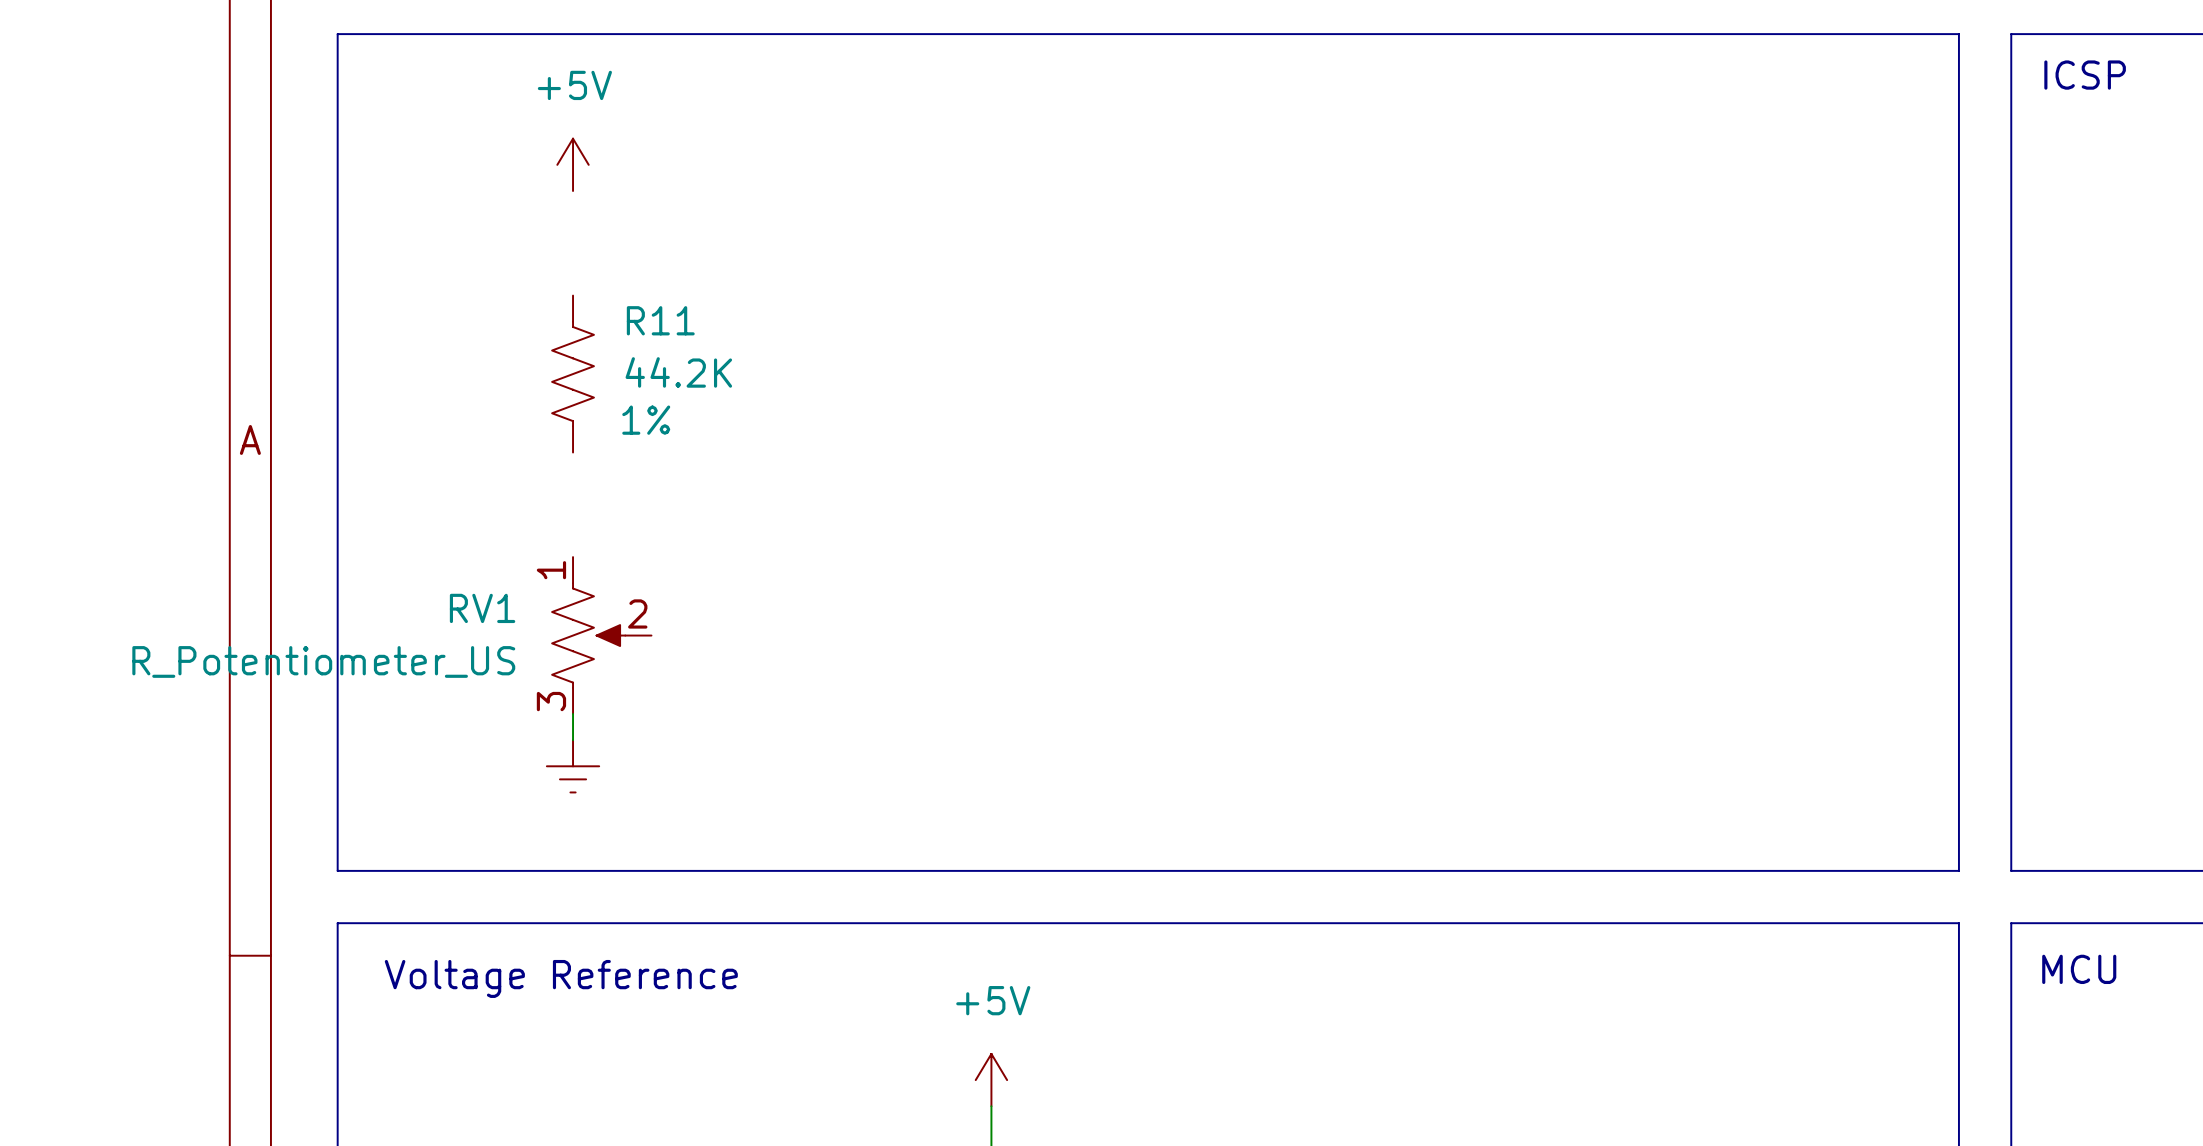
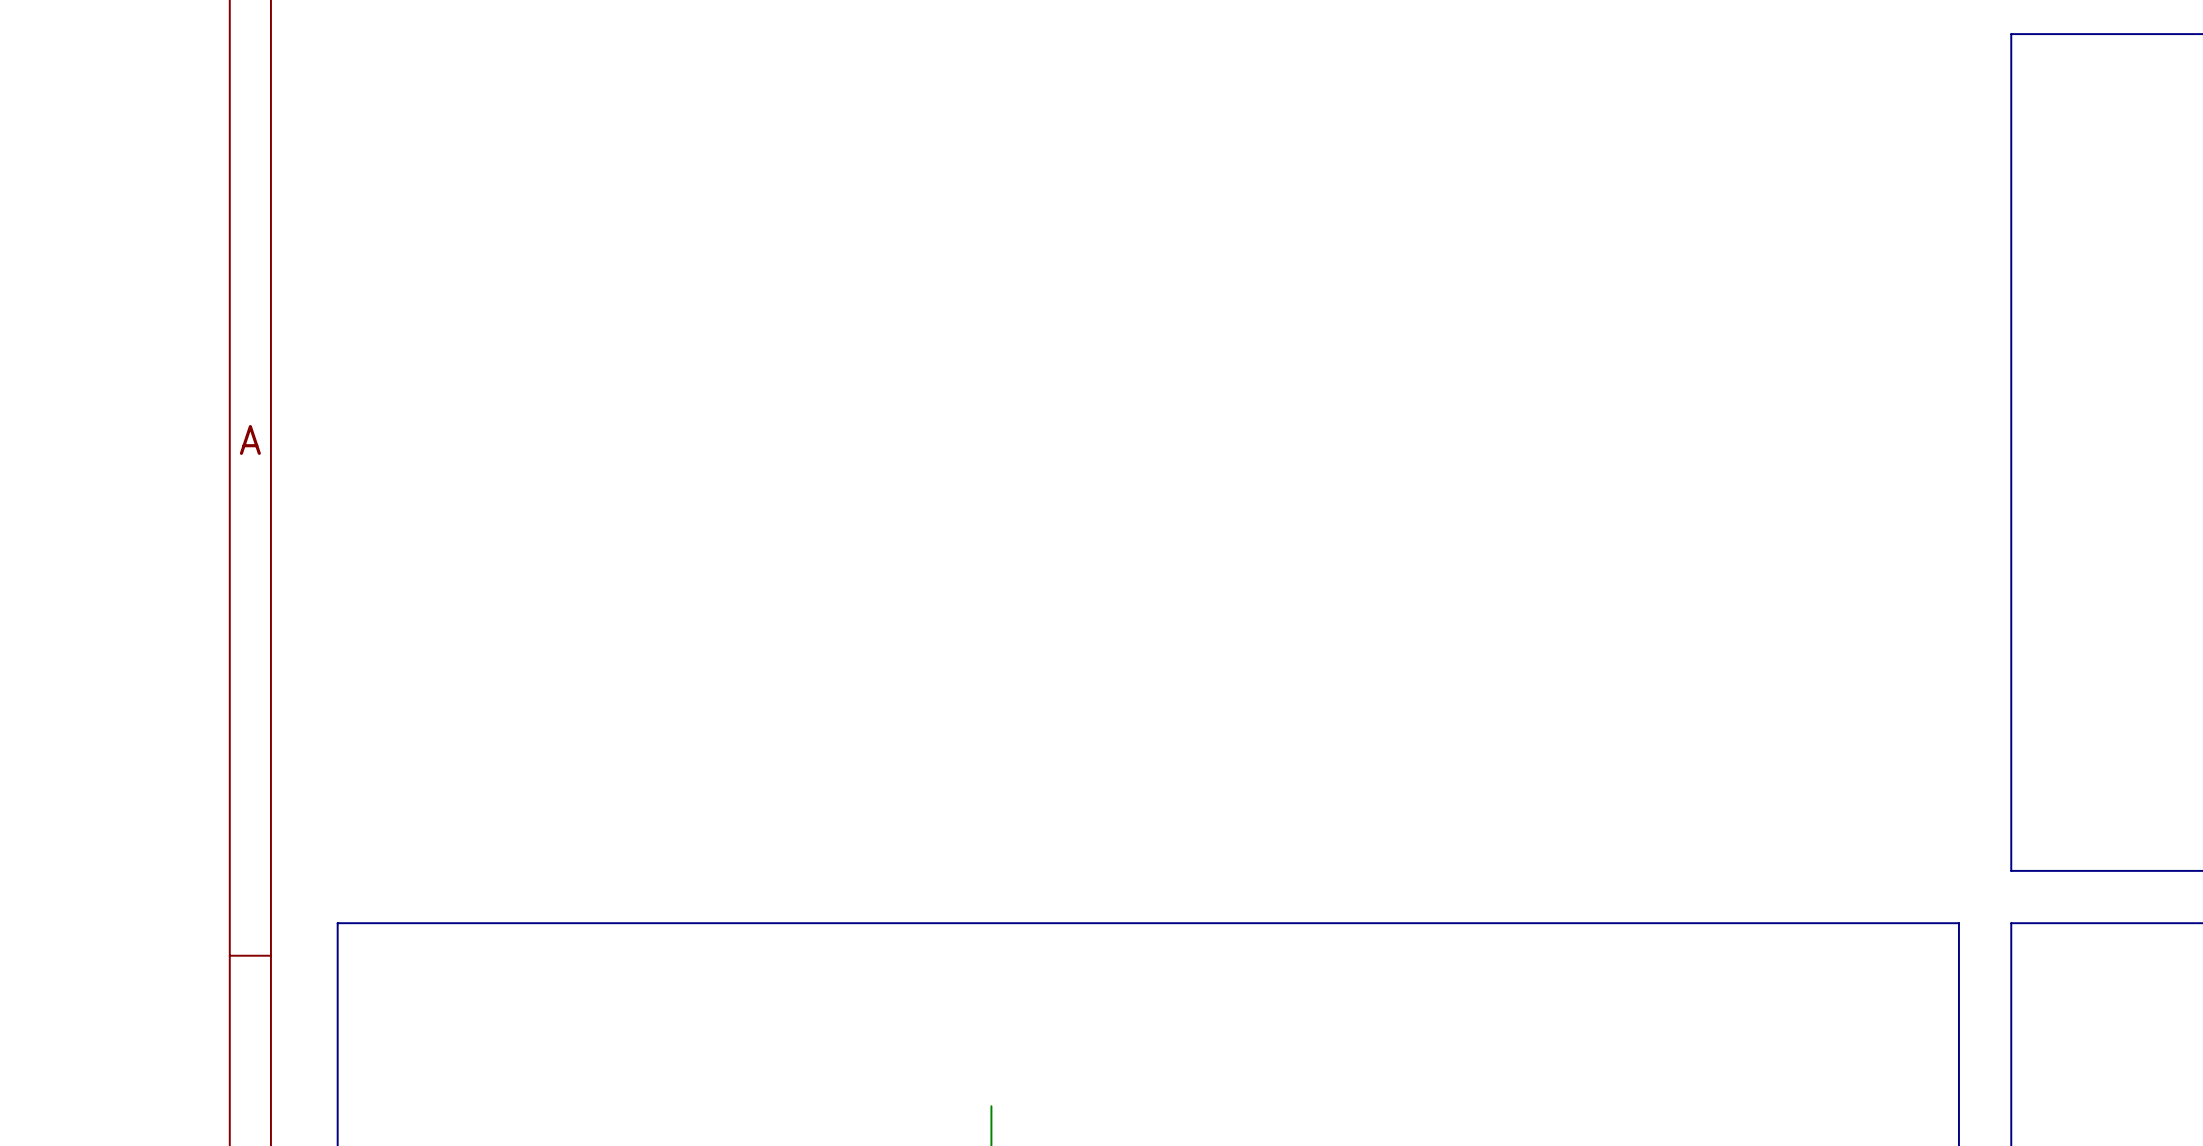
line: (337, 34) (337, 870) (1958, 870) (1958, 34) (337, 34) -> none
text: ICSP (2085, 75) -> none
power symbol: +5V (573, 164) -> none
R11: 44.2K (573, 374) -> none
RV1: R_Potentiometer_US (601, 635) -> none
wire: (573, 713) (573, 740) -> none
power symbol: (573, 766) -> none
text: MCU (2079, 969) -> none
text: Voltage Reference (561, 978) -> none
power symbol: +5V (991, 1080) -> none

